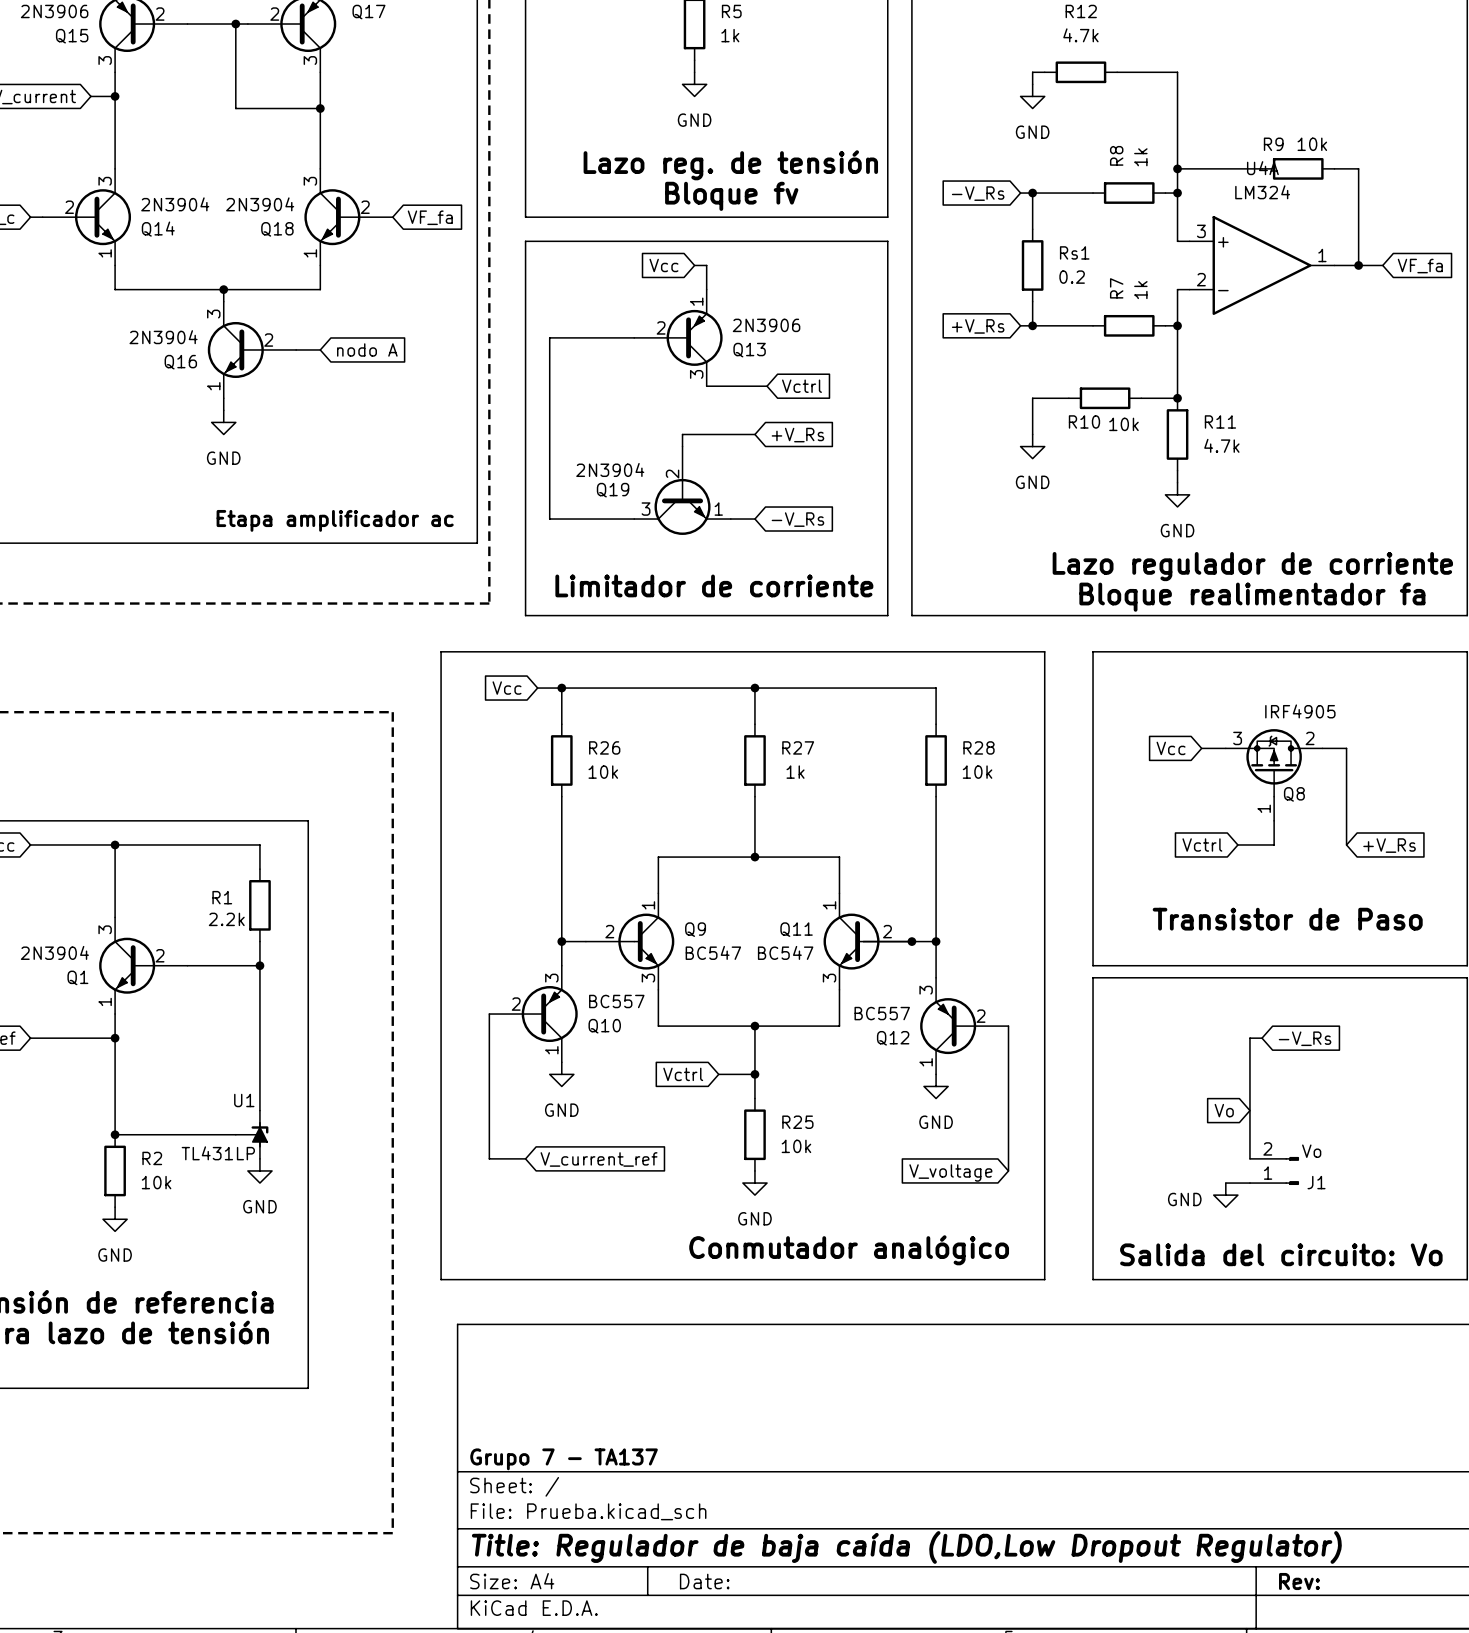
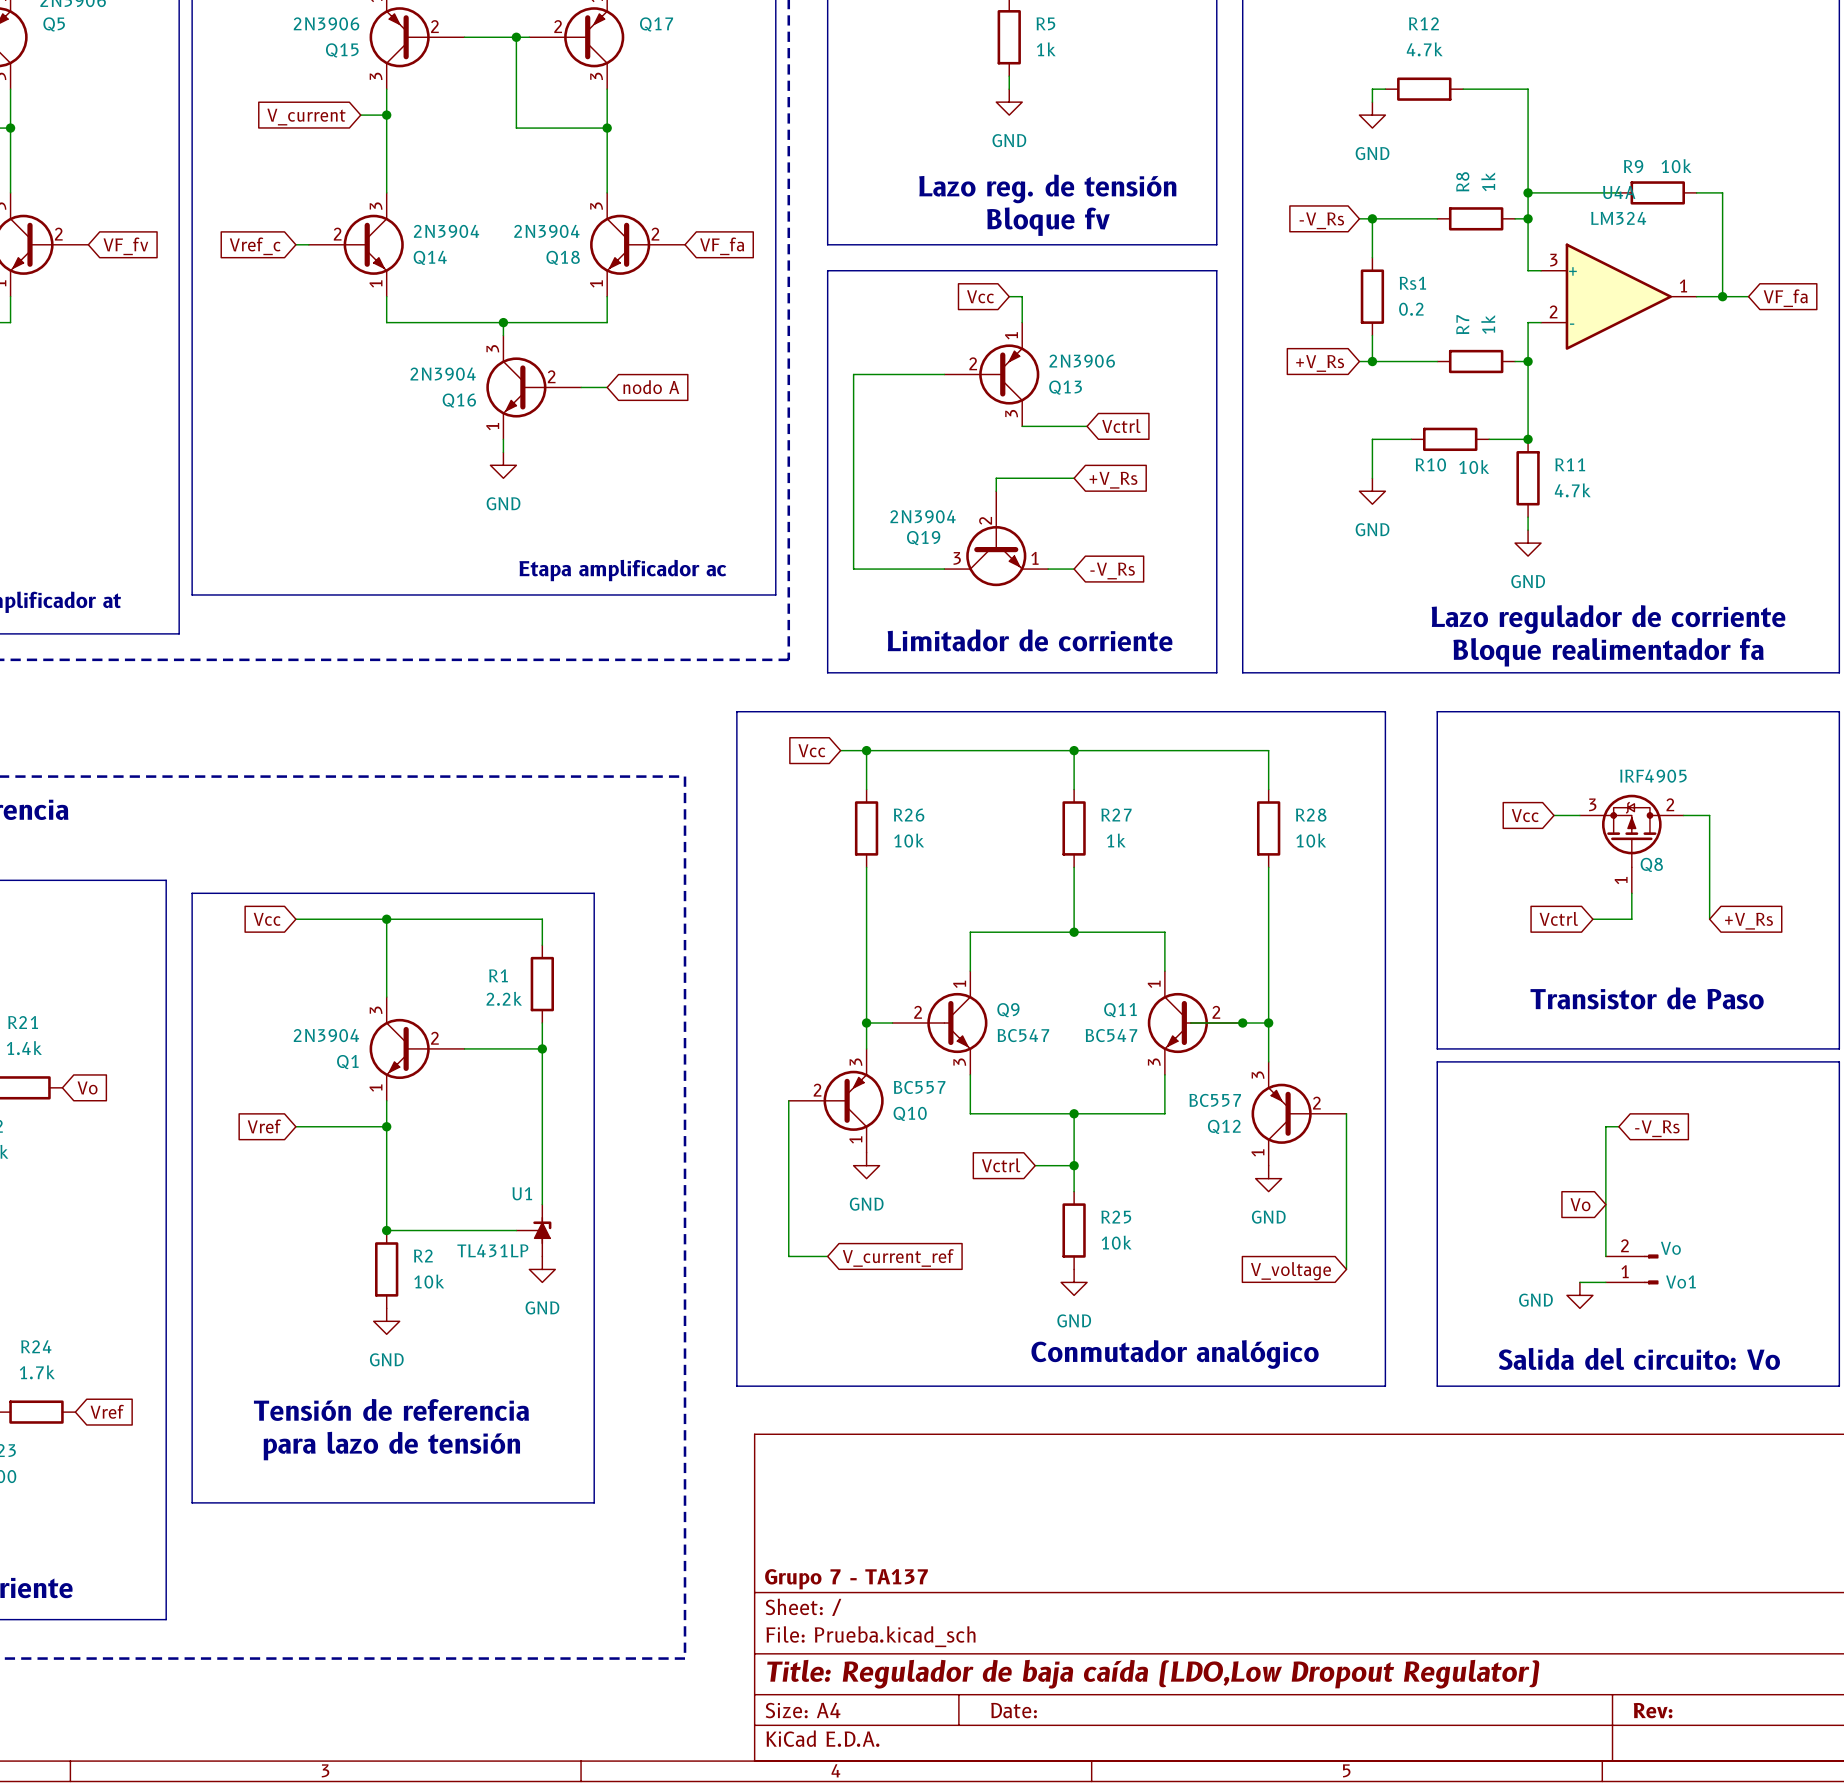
J1 name: J1 (1316, 1182) -> Vo1 (1680, 1282)

